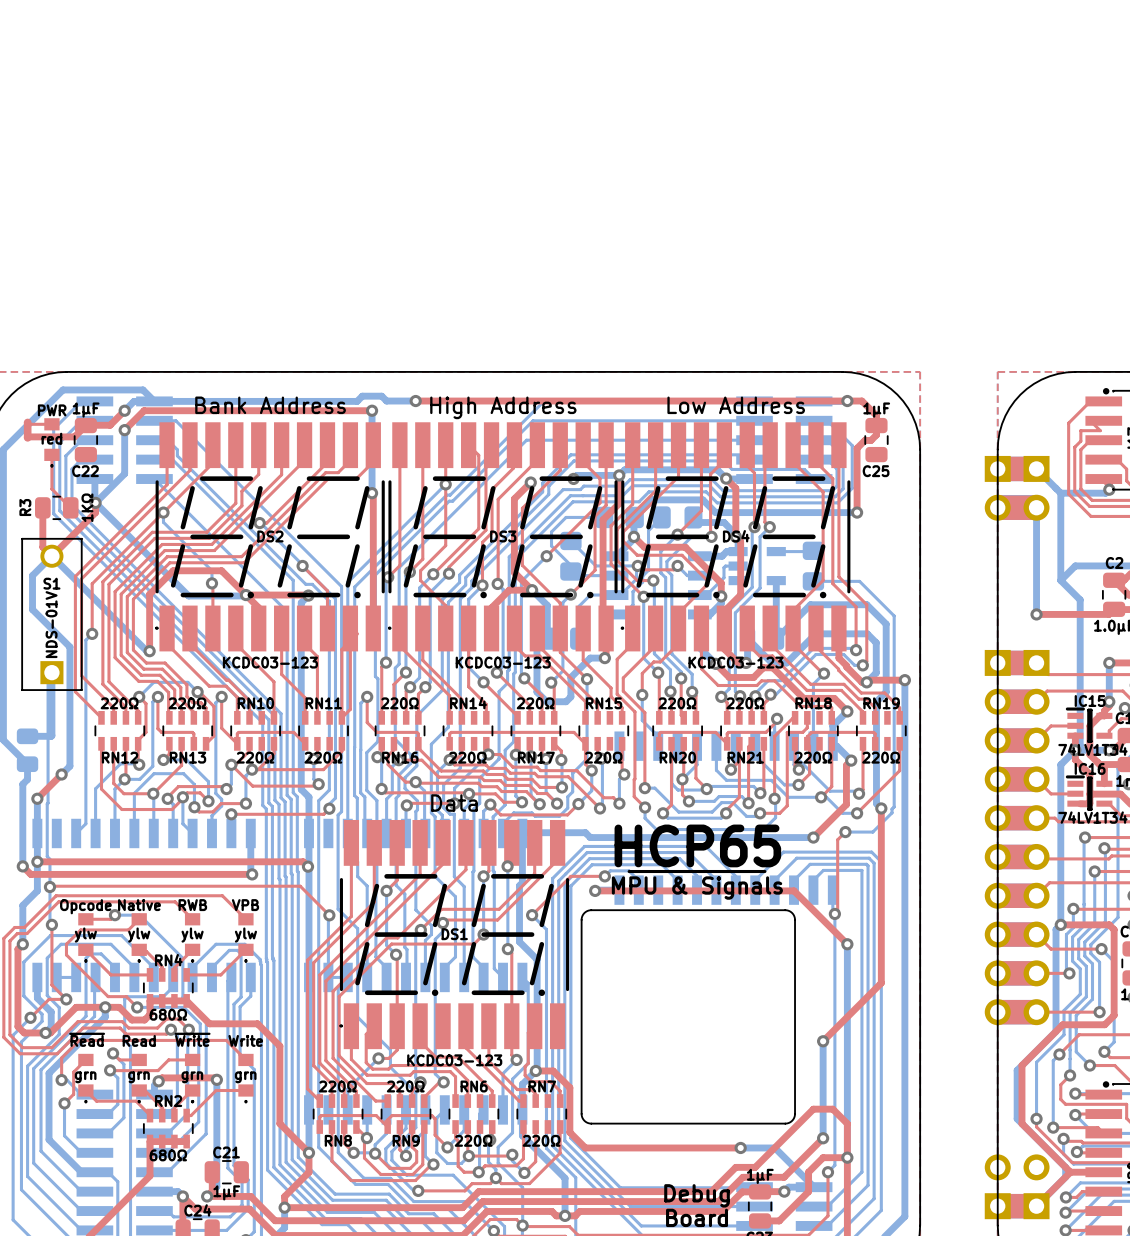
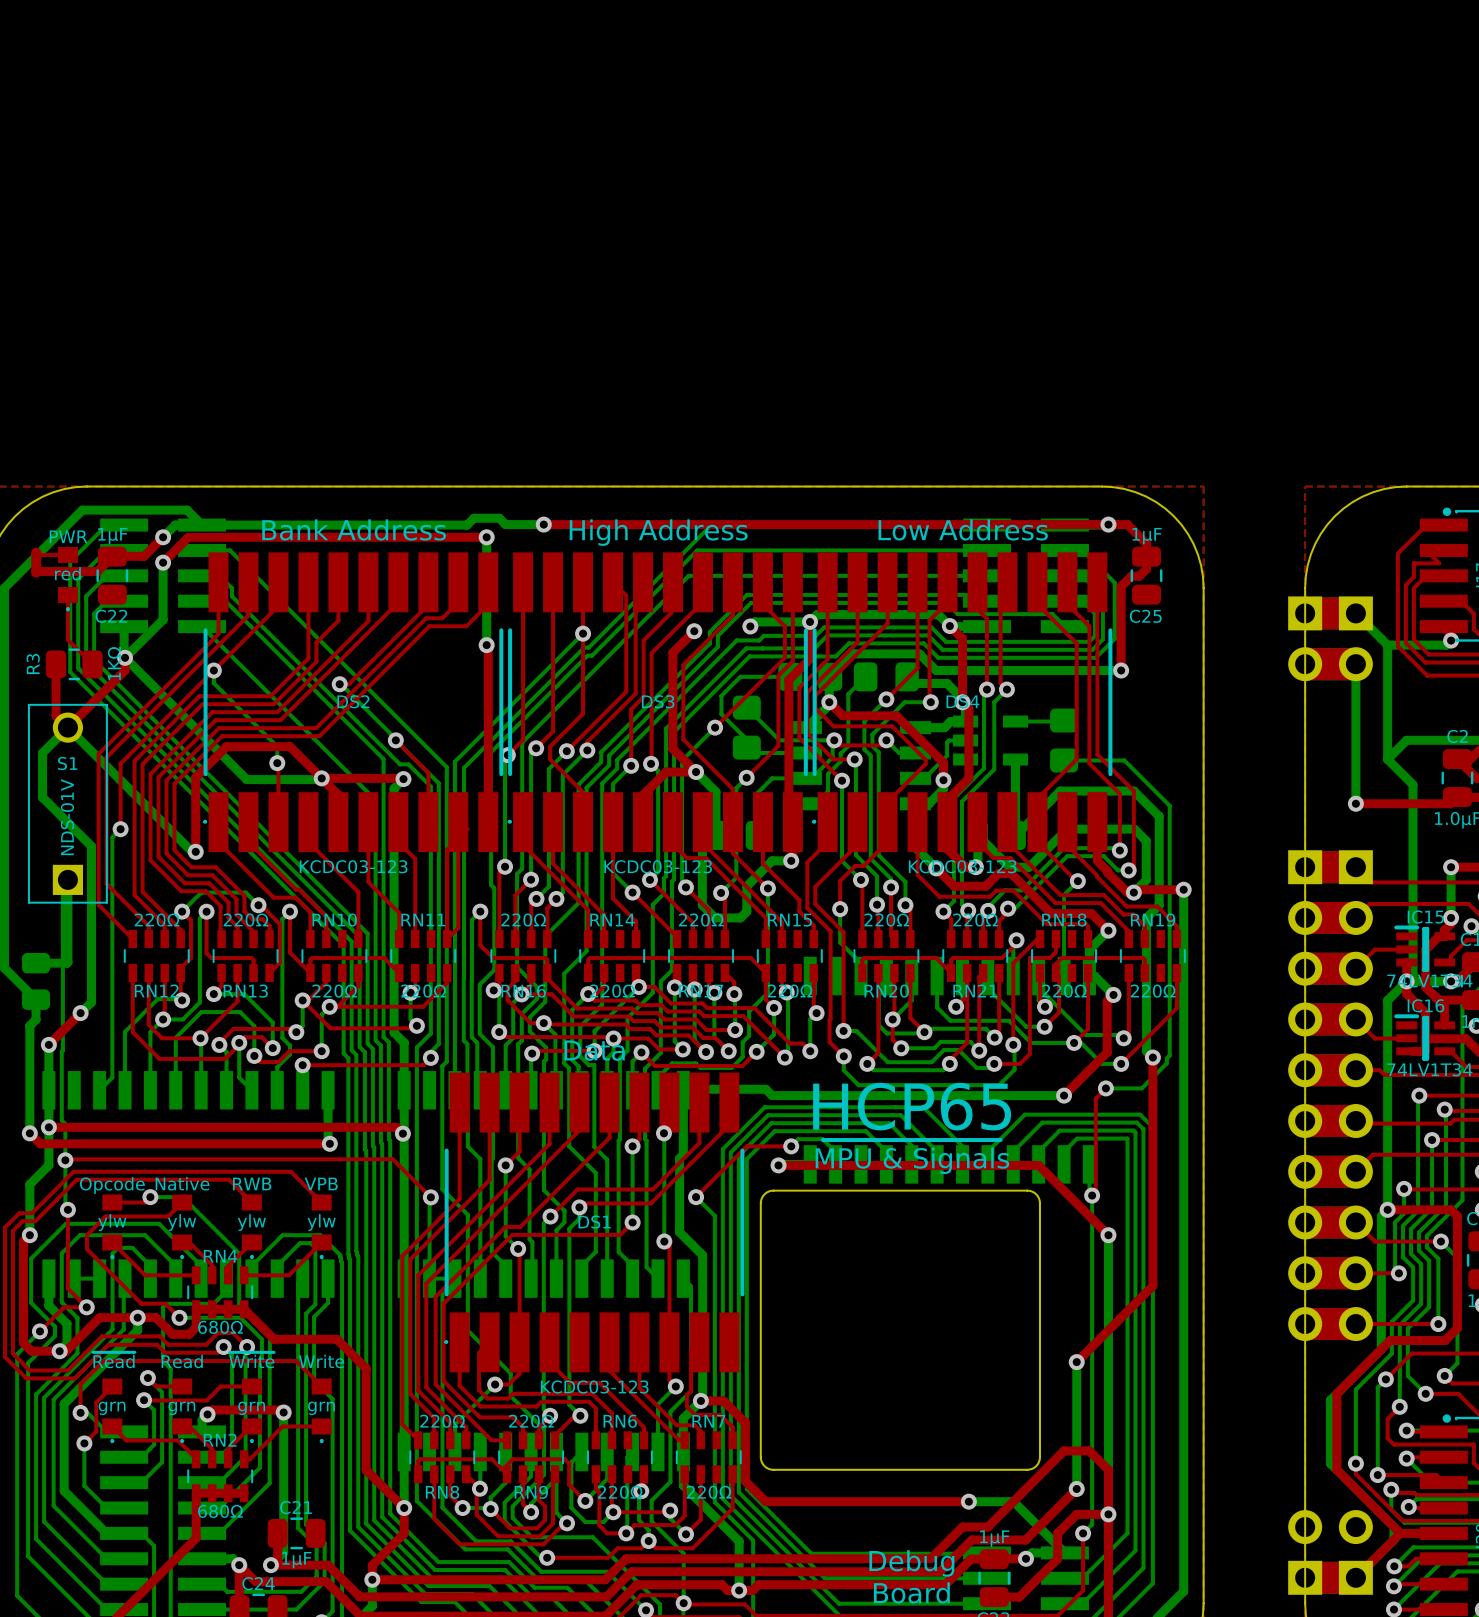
DS2 footprint: [155, 422, 385, 652] -> [203, 552, 504, 853]
DS3 footprint: [388, 422, 618, 652] -> [507, 552, 808, 853]
DS4 footprint: [620, 422, 851, 652] -> [812, 552, 1113, 853]
DS1 footprint: [339, 819, 570, 1050] -> [444, 1072, 745, 1373]

